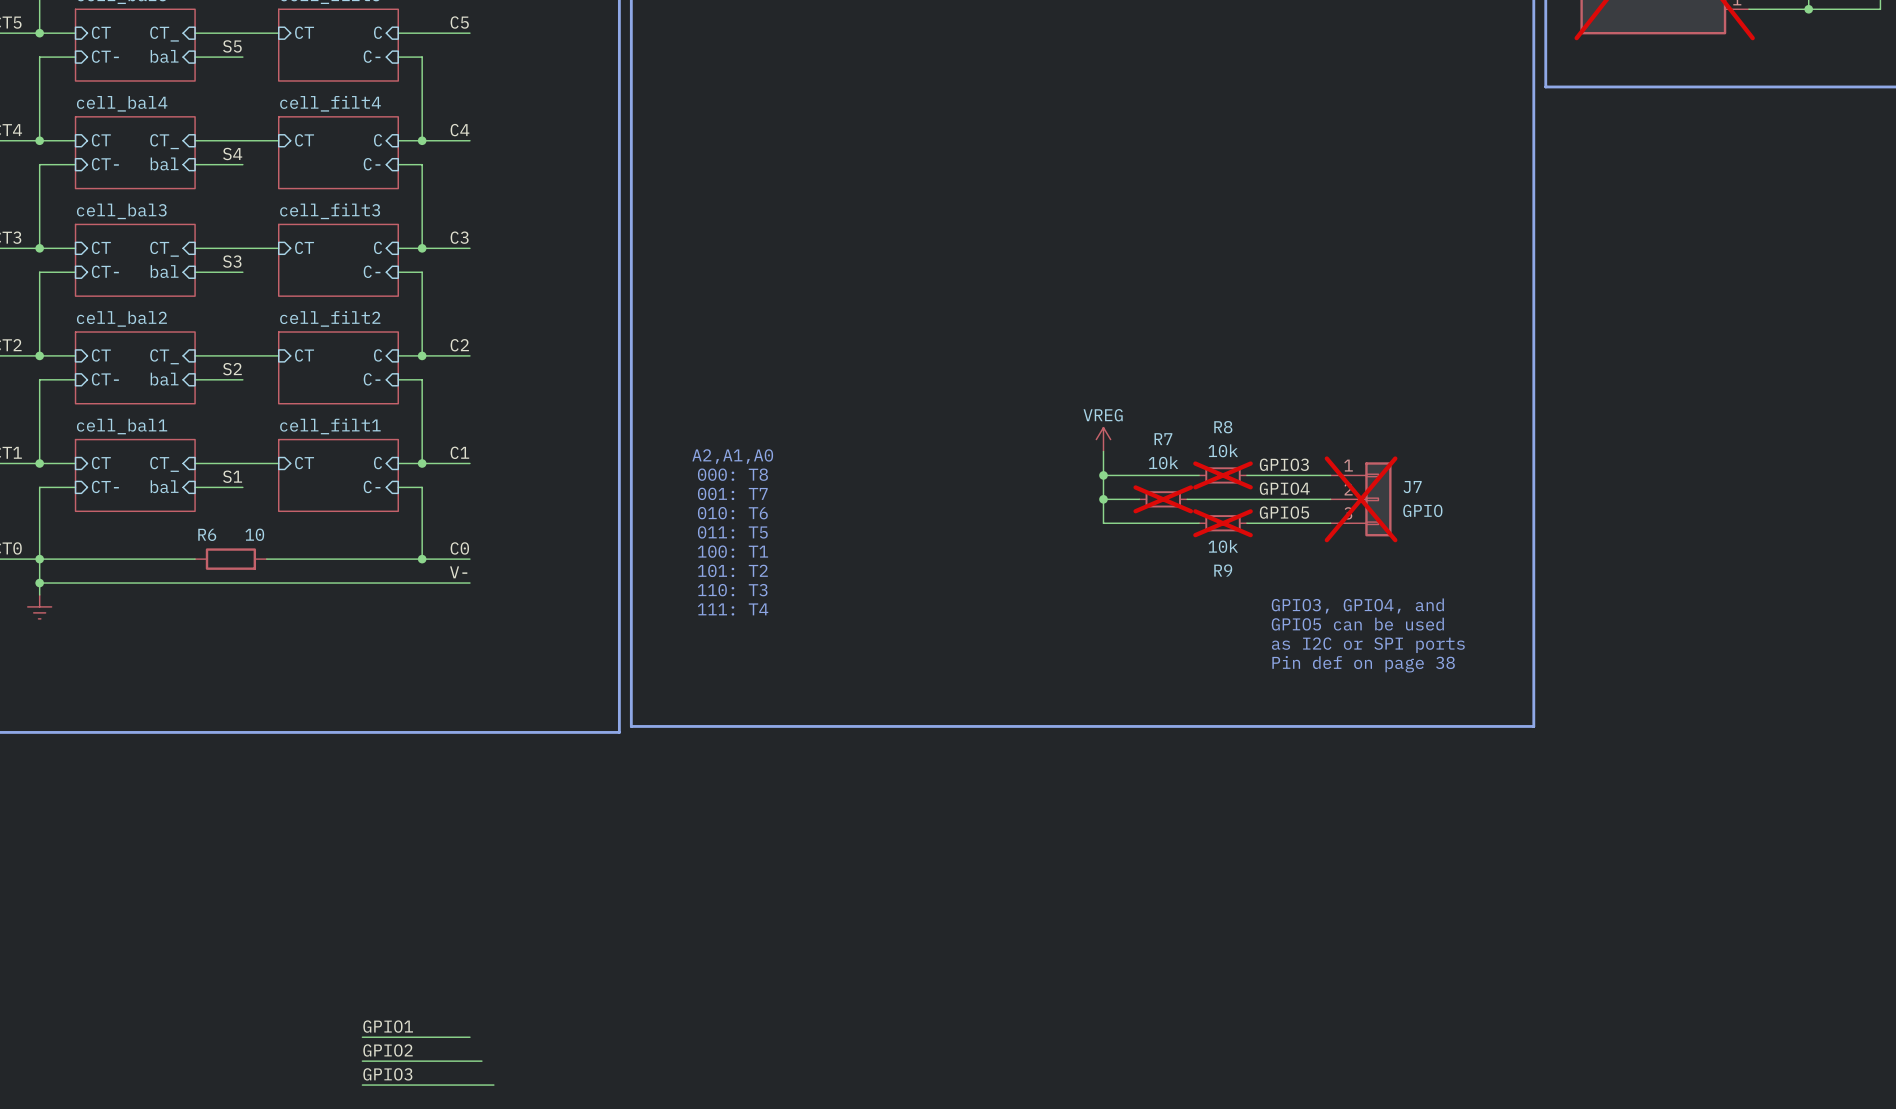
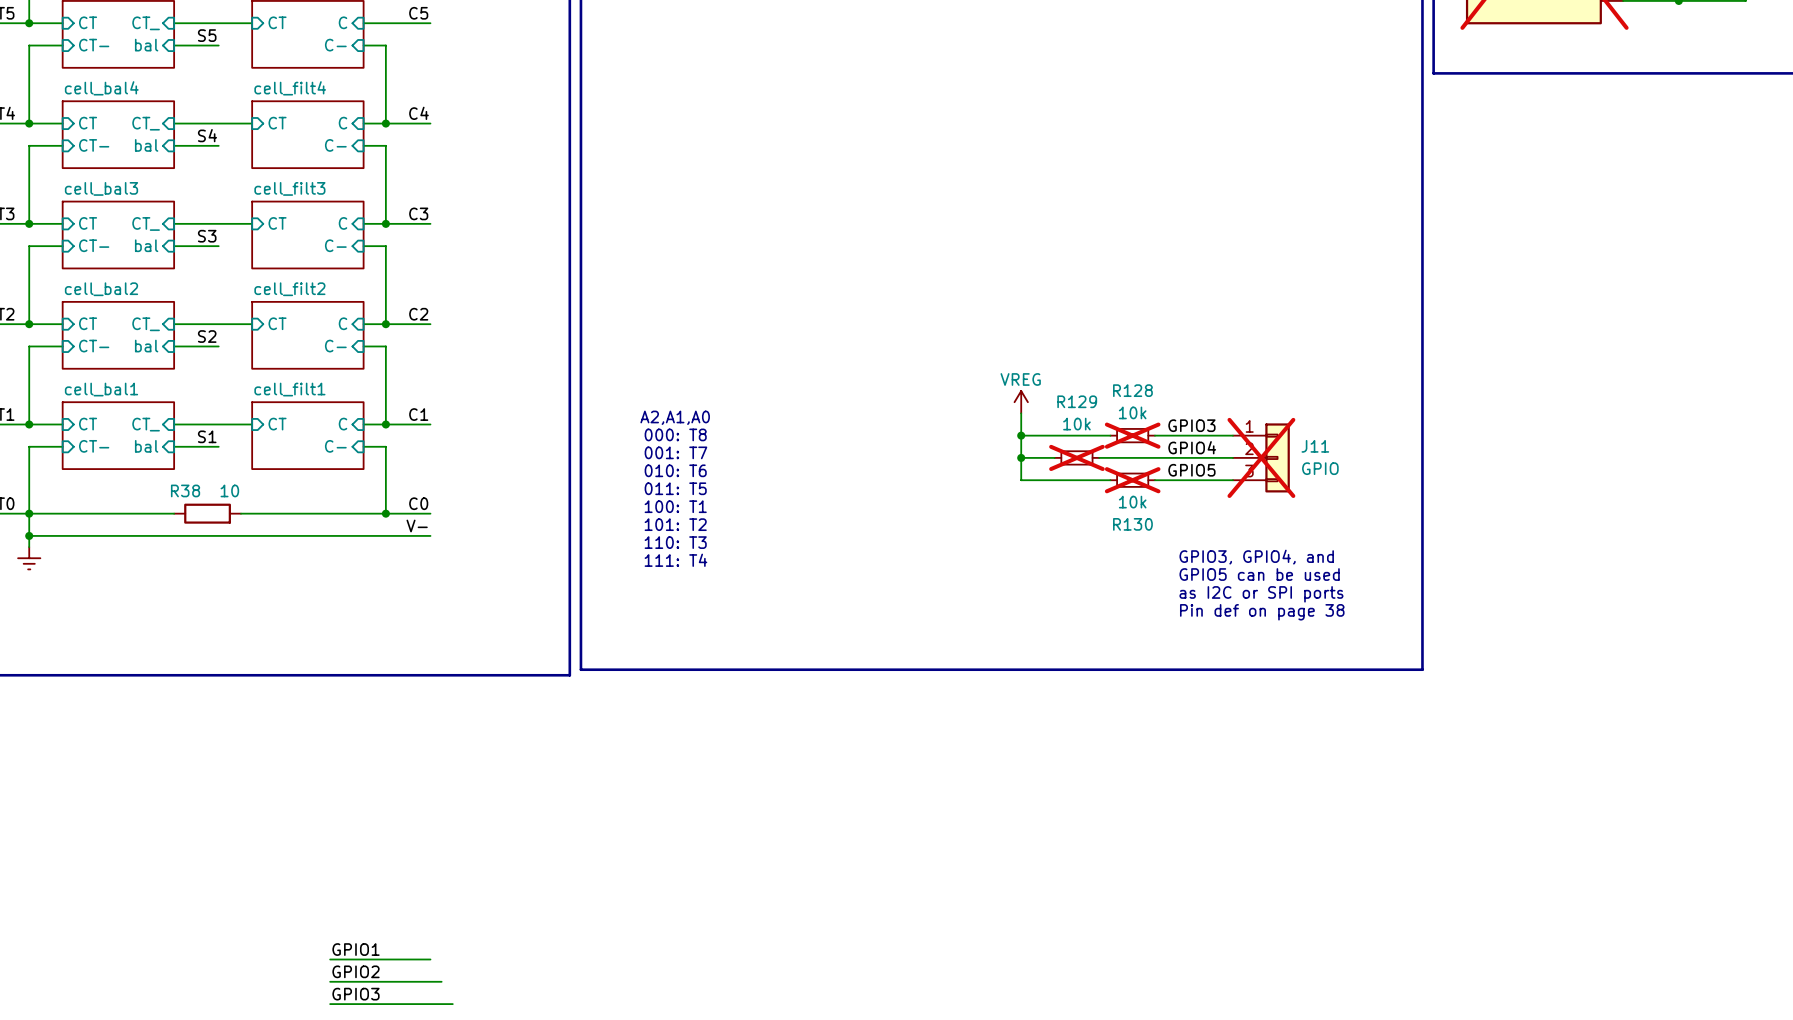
R8 name: R8 (1223, 427) -> R128 (1132, 390)
R7 name: R7 (1163, 439) -> R129 (1077, 401)
J7 name: J7 (1412, 487) -> J11 (1315, 446)
R6 name: R6 (207, 534) -> R38 (185, 490)
R9 name: R9 (1223, 570) -> R130 (1132, 524)

